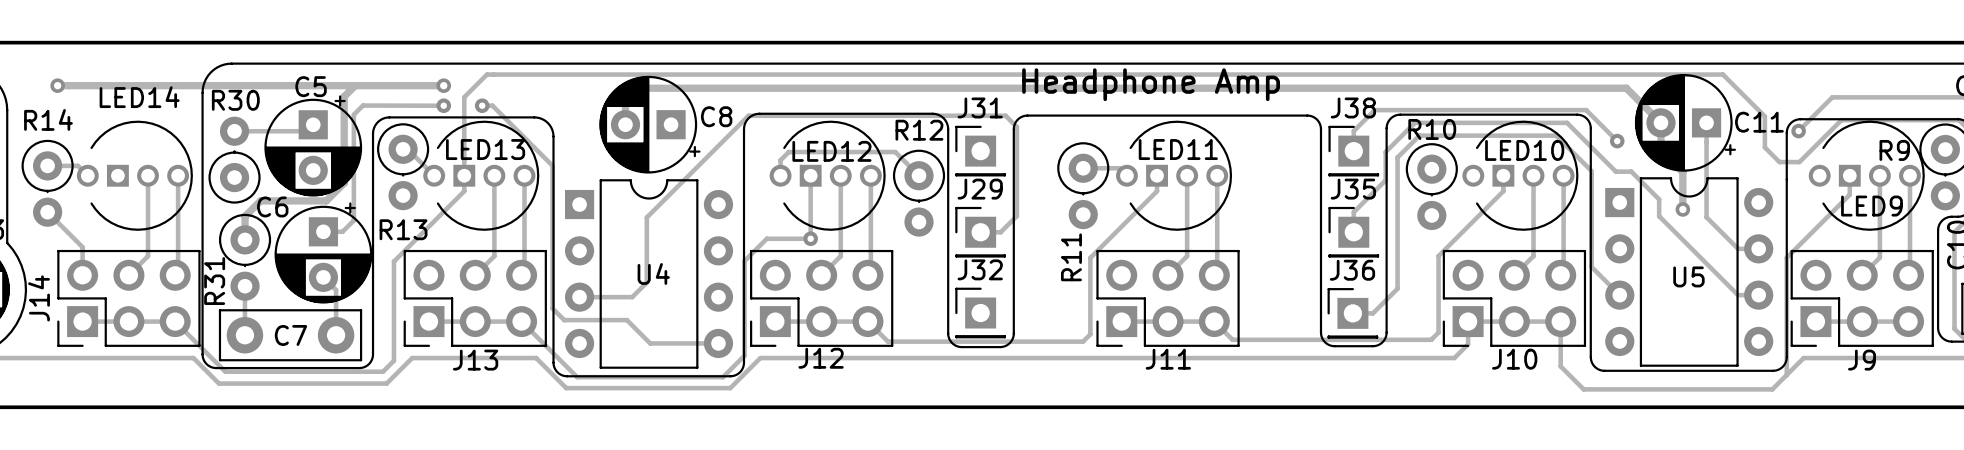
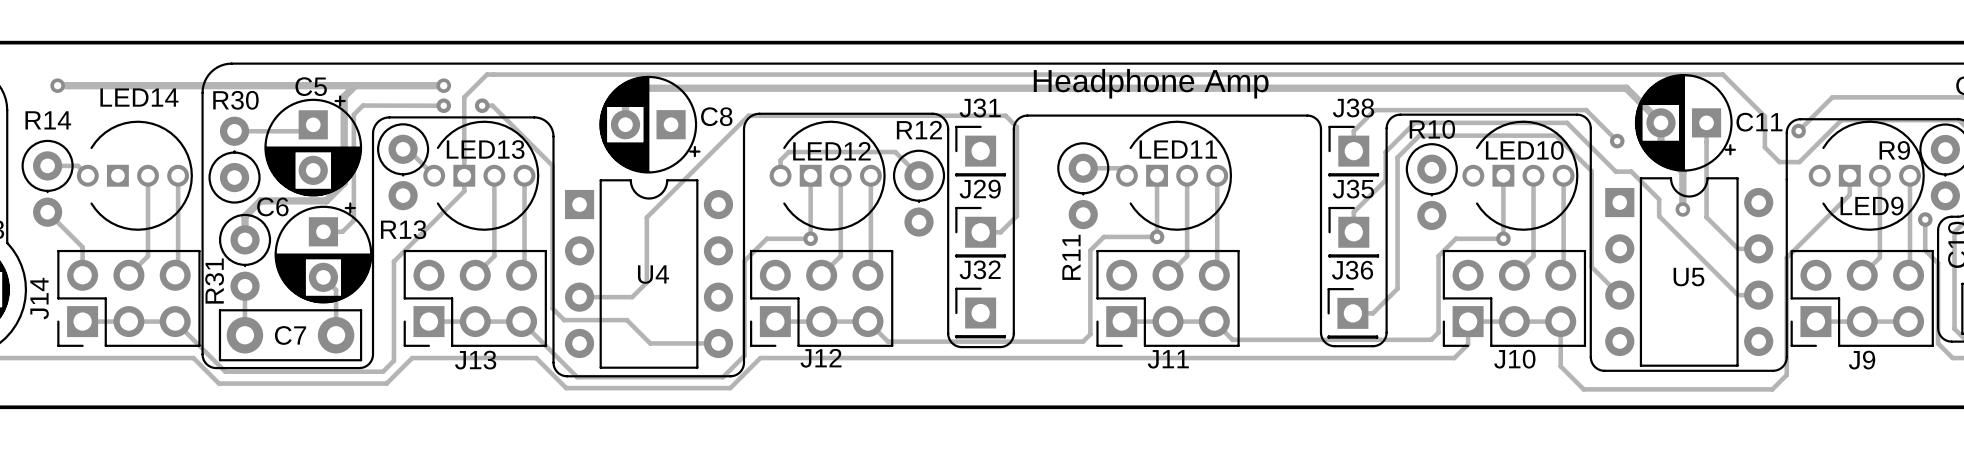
track: (1157, 191) (1090, 257) -> (1157, 191) (1157, 236) (1103, 236) (1090, 250) (1090, 257)
track: (1503, 191) (1455, 238) -> (1503, 191) (1503, 238) (1456, 238)
via: none -> (1925, 219)
via: none -> (1157, 236)
via: none -> (1503, 238)
track: (1952, 358) (1803, 358) (1786, 374) -> (1952, 358) (1938, 343) (1938, 263) (1925, 250) (1925, 219)

